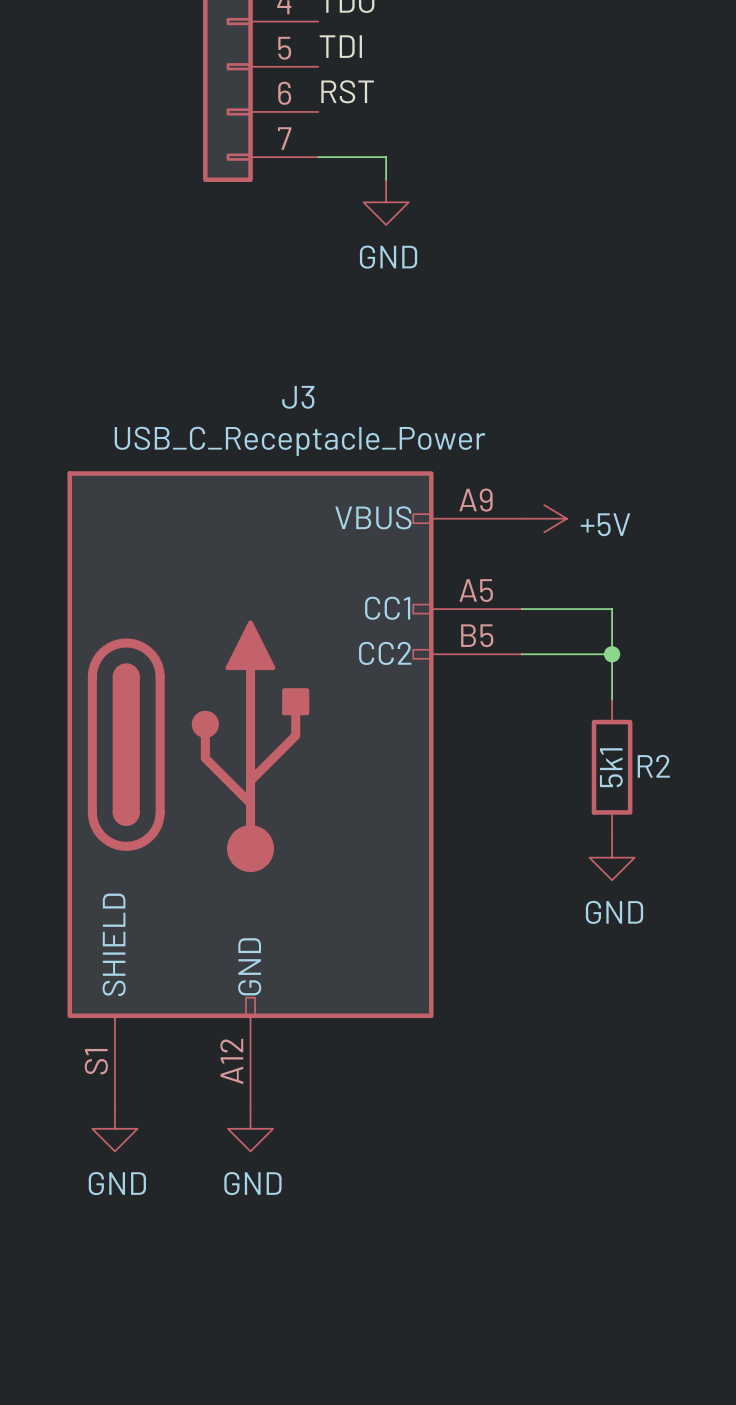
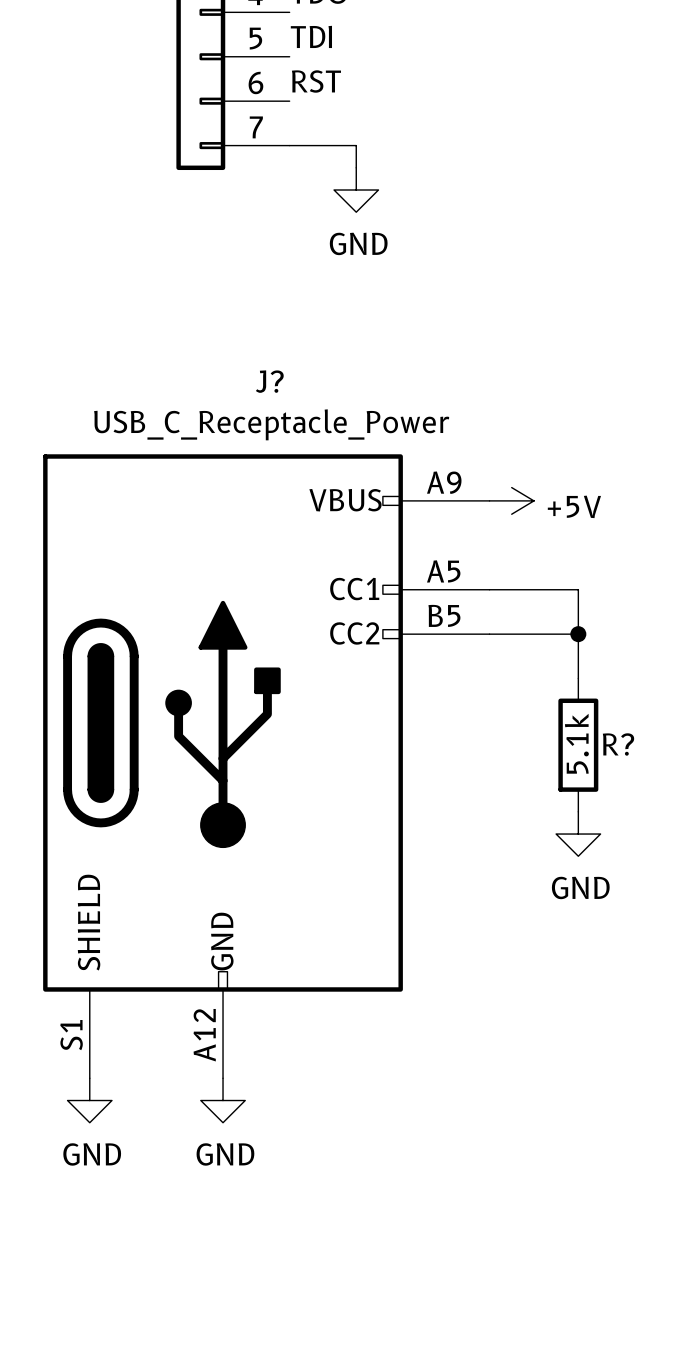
J3 name: J3 (298, 397) -> J? (269, 381)
R2 name: R2 (653, 766) -> R? (618, 744)
R2 value: 5k1 (611, 767) -> 5.1k (576, 743)

